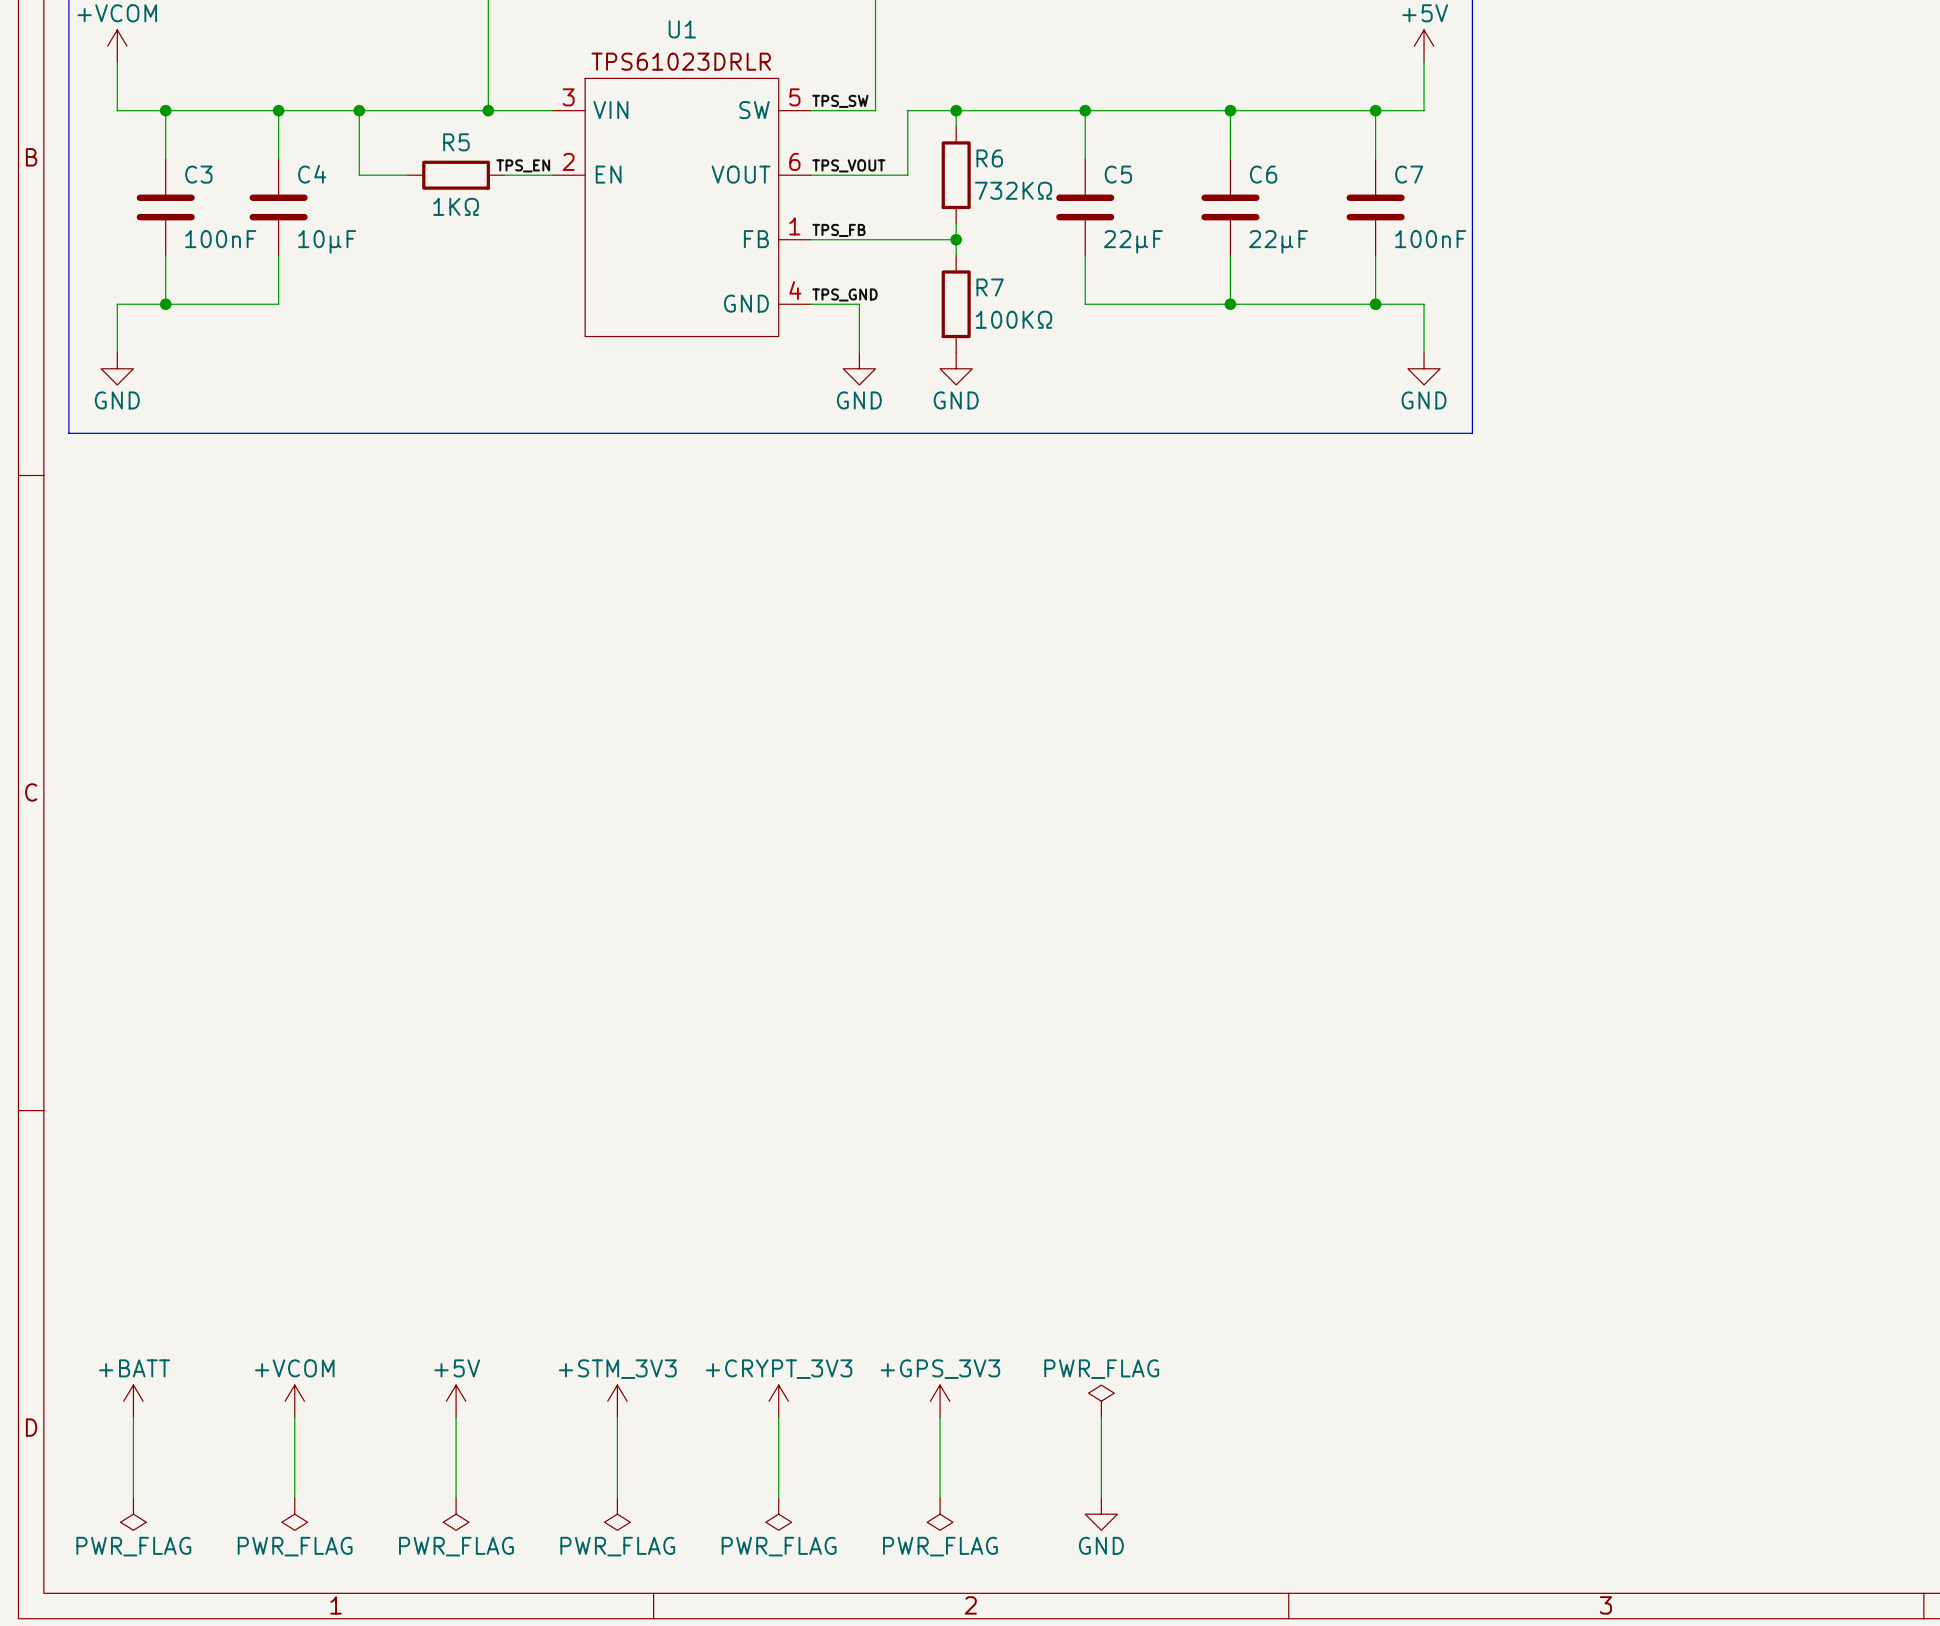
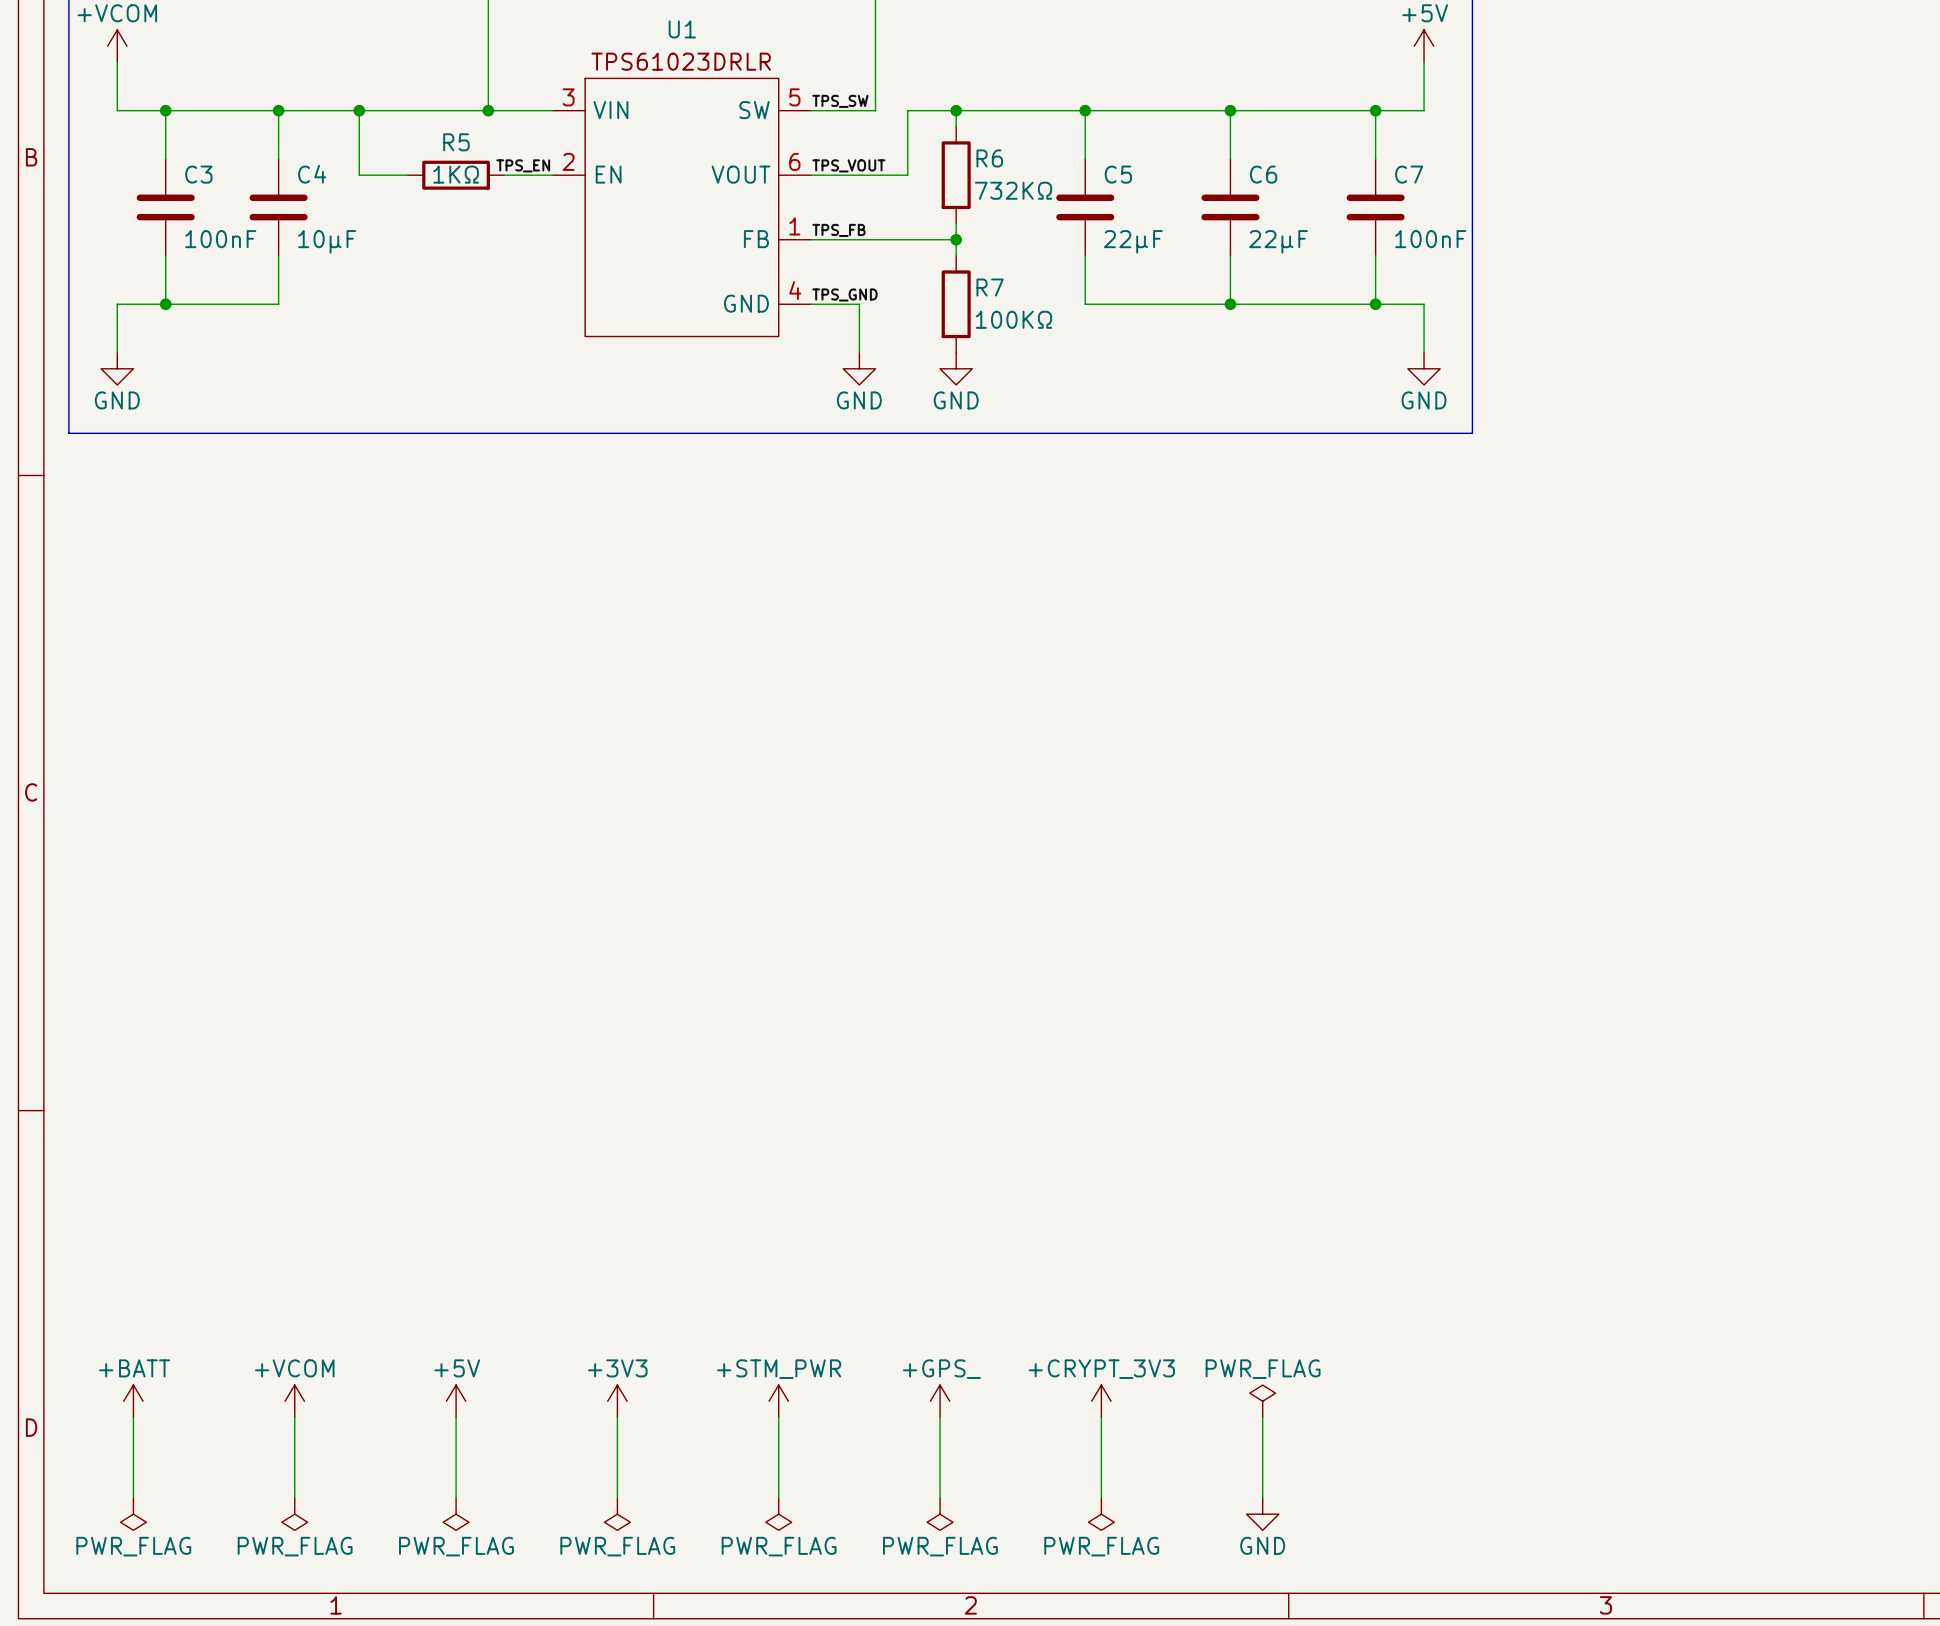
R5 value position: 1KΩ (456, 206) -> 1KΩ (456, 174)
power symbol: +STM_3V3 (617, 1401) -> +3V3 (617, 1401)
power symbol: +CRYPT_3V3 (778, 1401) -> +STM_PWR (778, 1401)
power symbol: +GPS_3V3 (940, 1401) -> +GPS_ (940, 1401)
power symbol: PWR_FLAG (1101, 1401) -> +CRYPT_3V3 (1101, 1401)
power symbol: none -> PWR_FLAG (1262, 1401)
wire: none -> (1262, 1417) (1262, 1498)
power symbol: GND (1101, 1514) -> PWR_FLAG (1101, 1514)
power symbol: none -> GND (1262, 1514)

